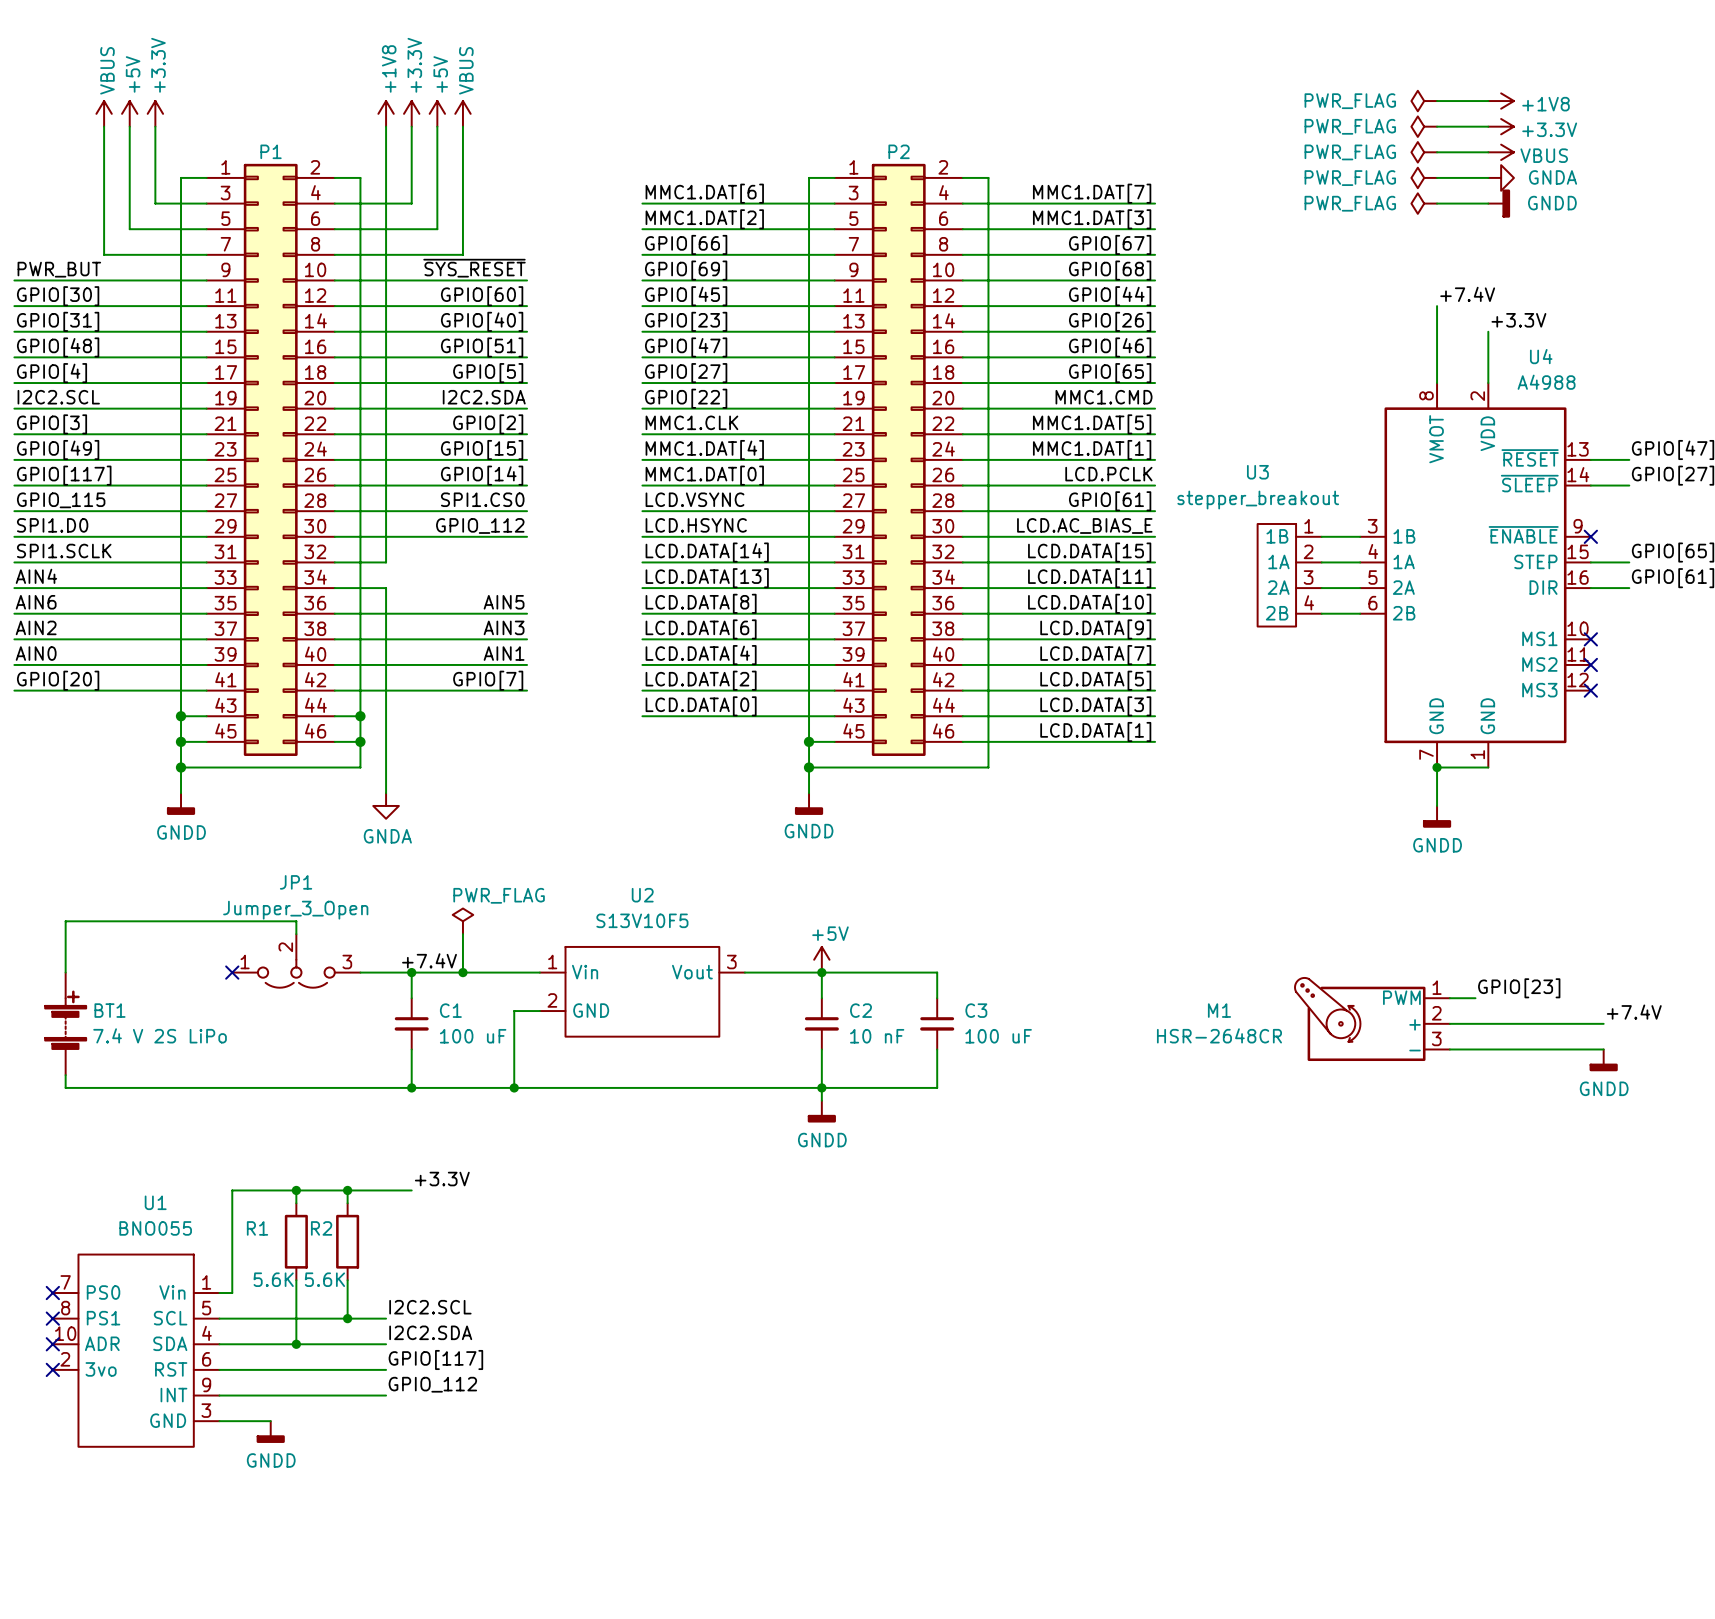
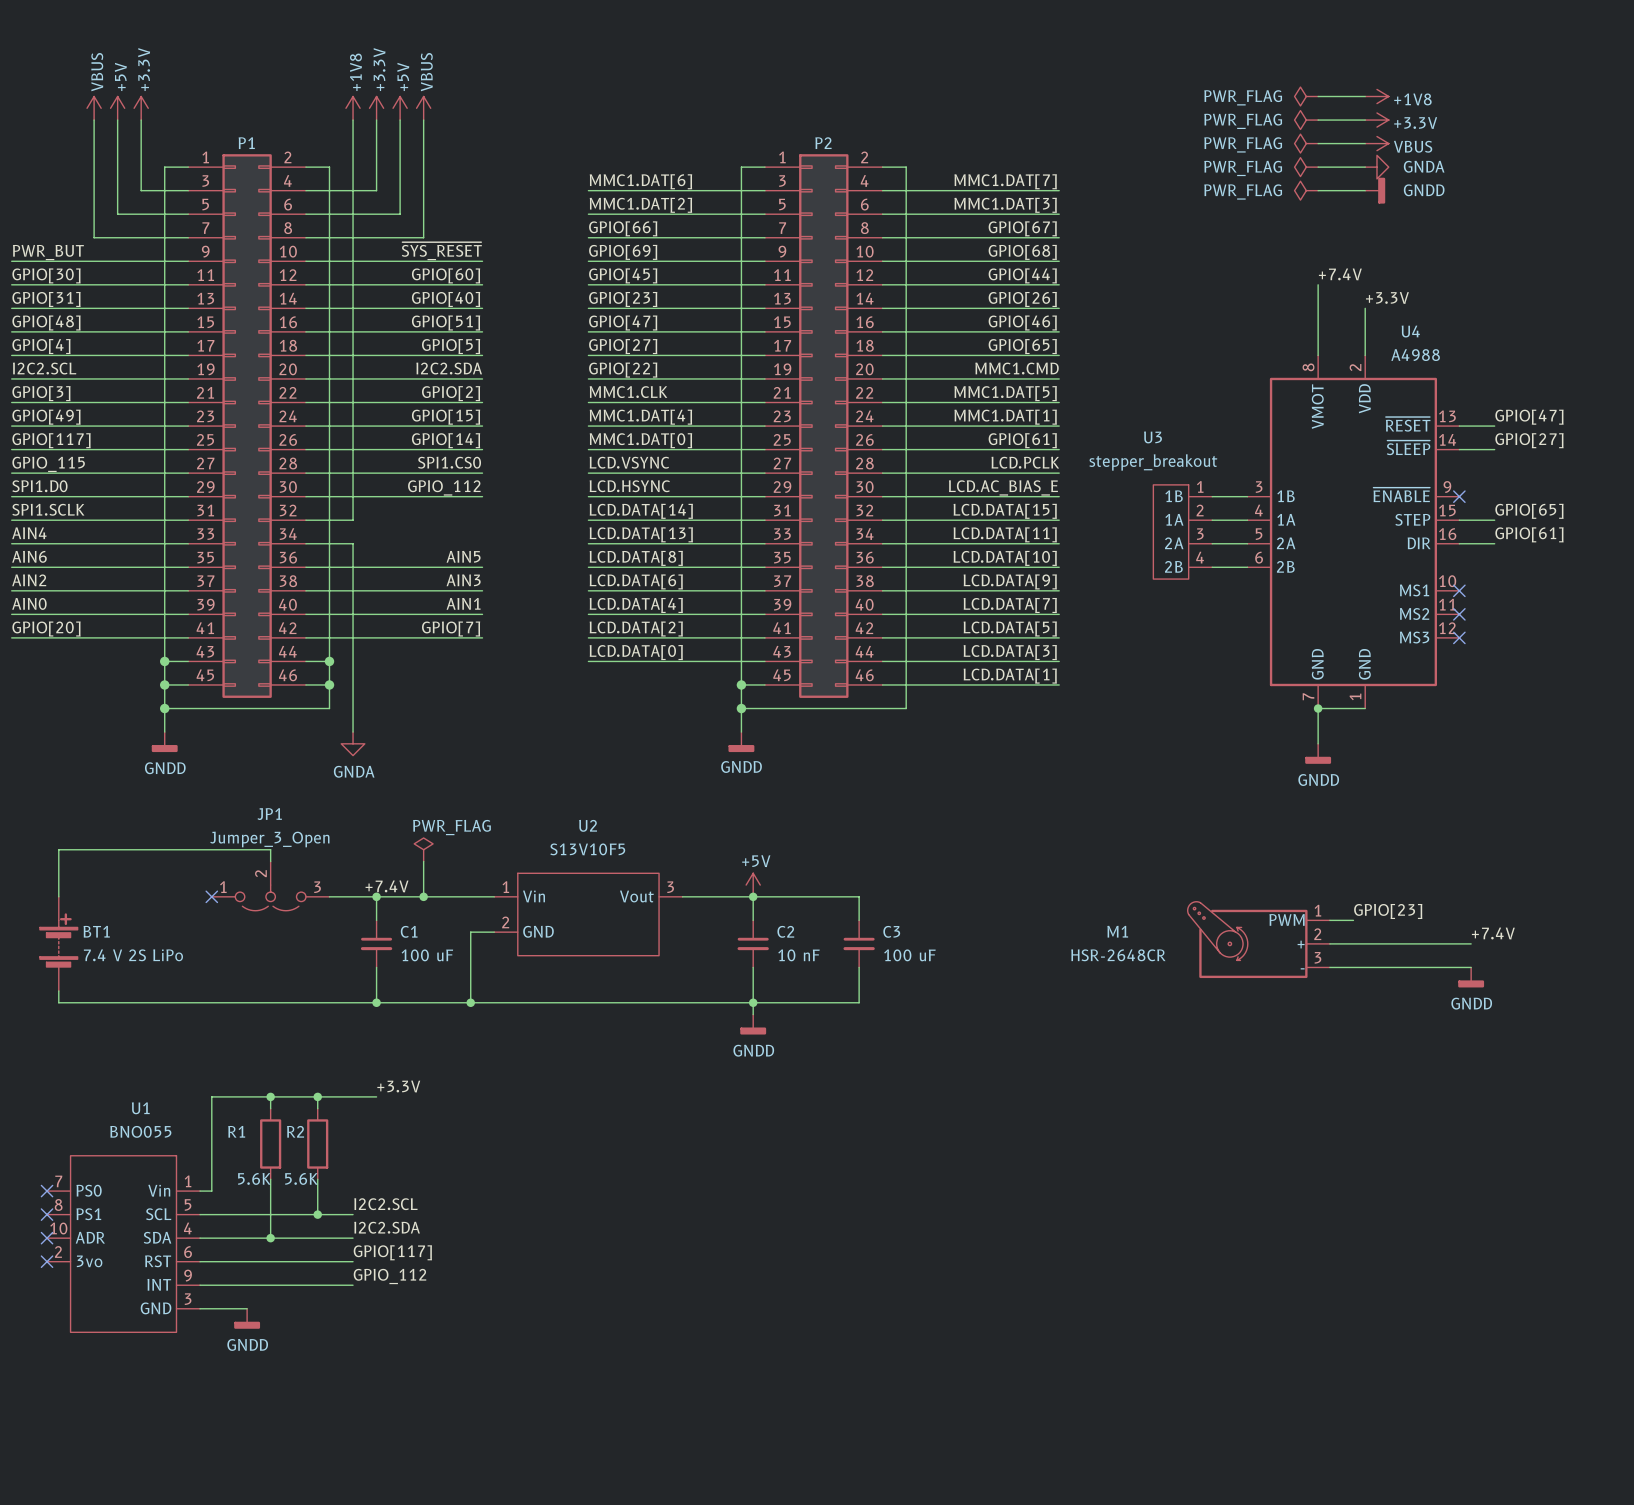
label: LCD.PCLK (1108, 474) -> GPIO[61] (1022, 440)
label: GPIO[61] (1110, 501) -> LCD.PCLK (1025, 462)

